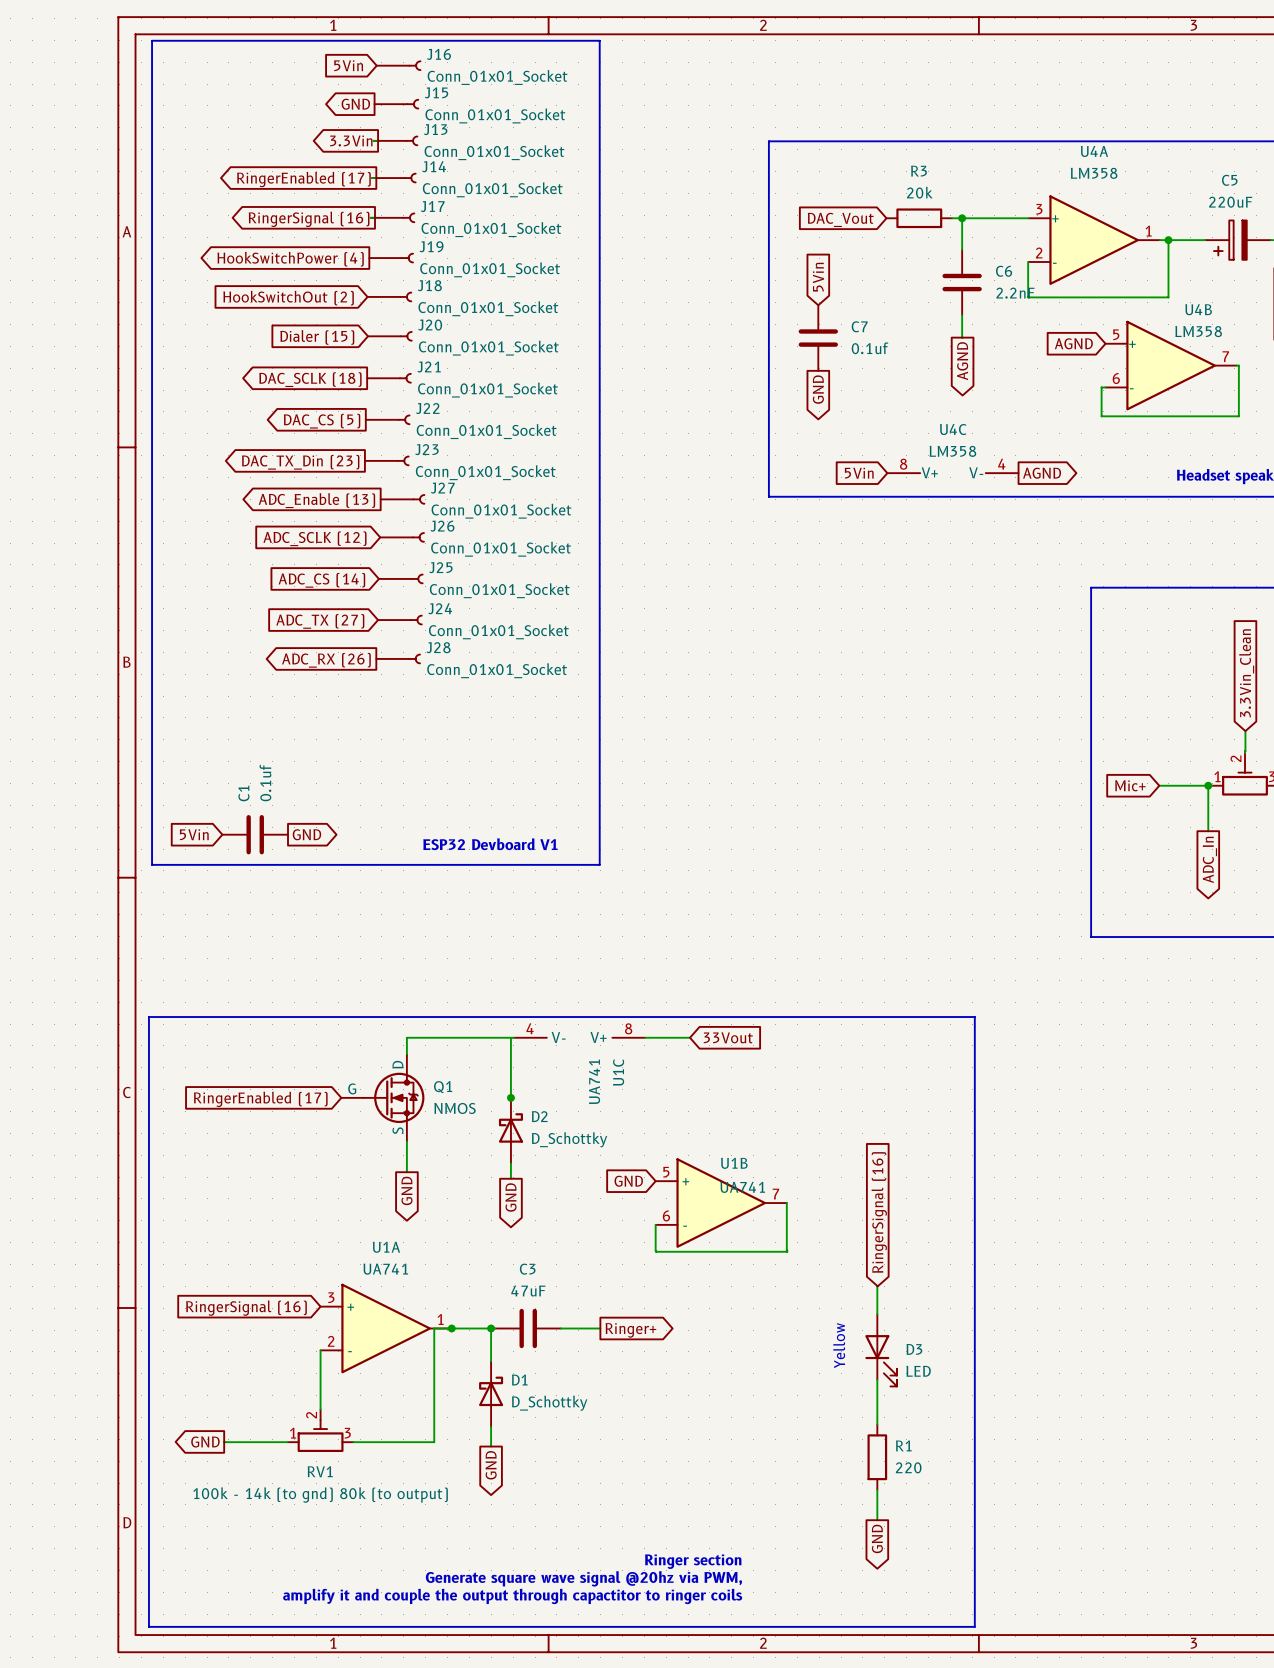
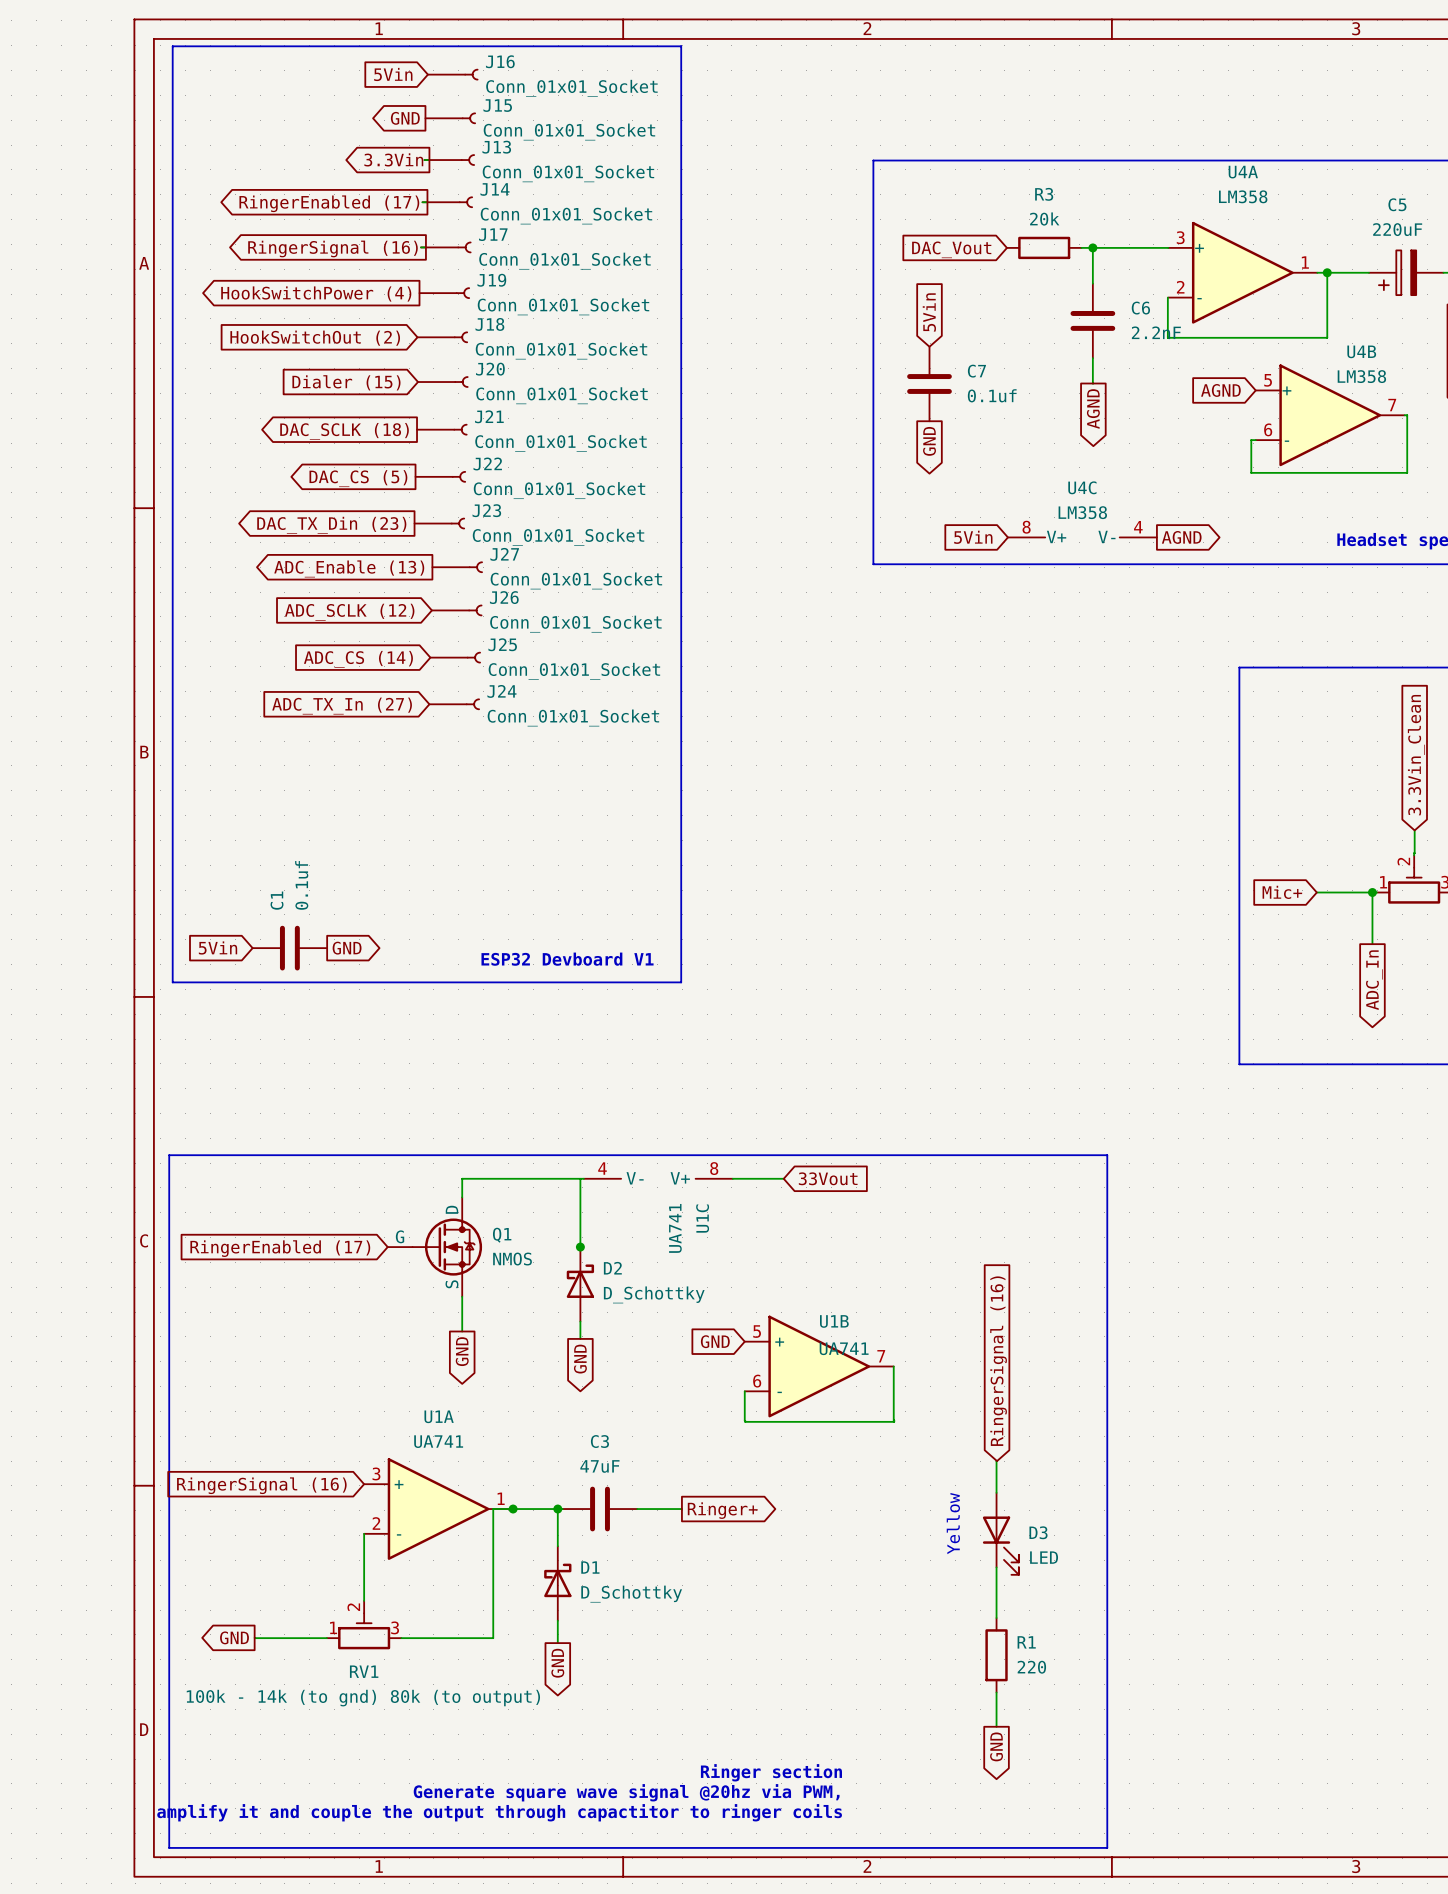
global label: ADC_TX (27) (320, 621) -> ADC_TX_In (27) (342, 706)
J28: Conn_01x01_Socket (398, 658) -> none
global label: ADC_RX (26) (326, 660) -> none

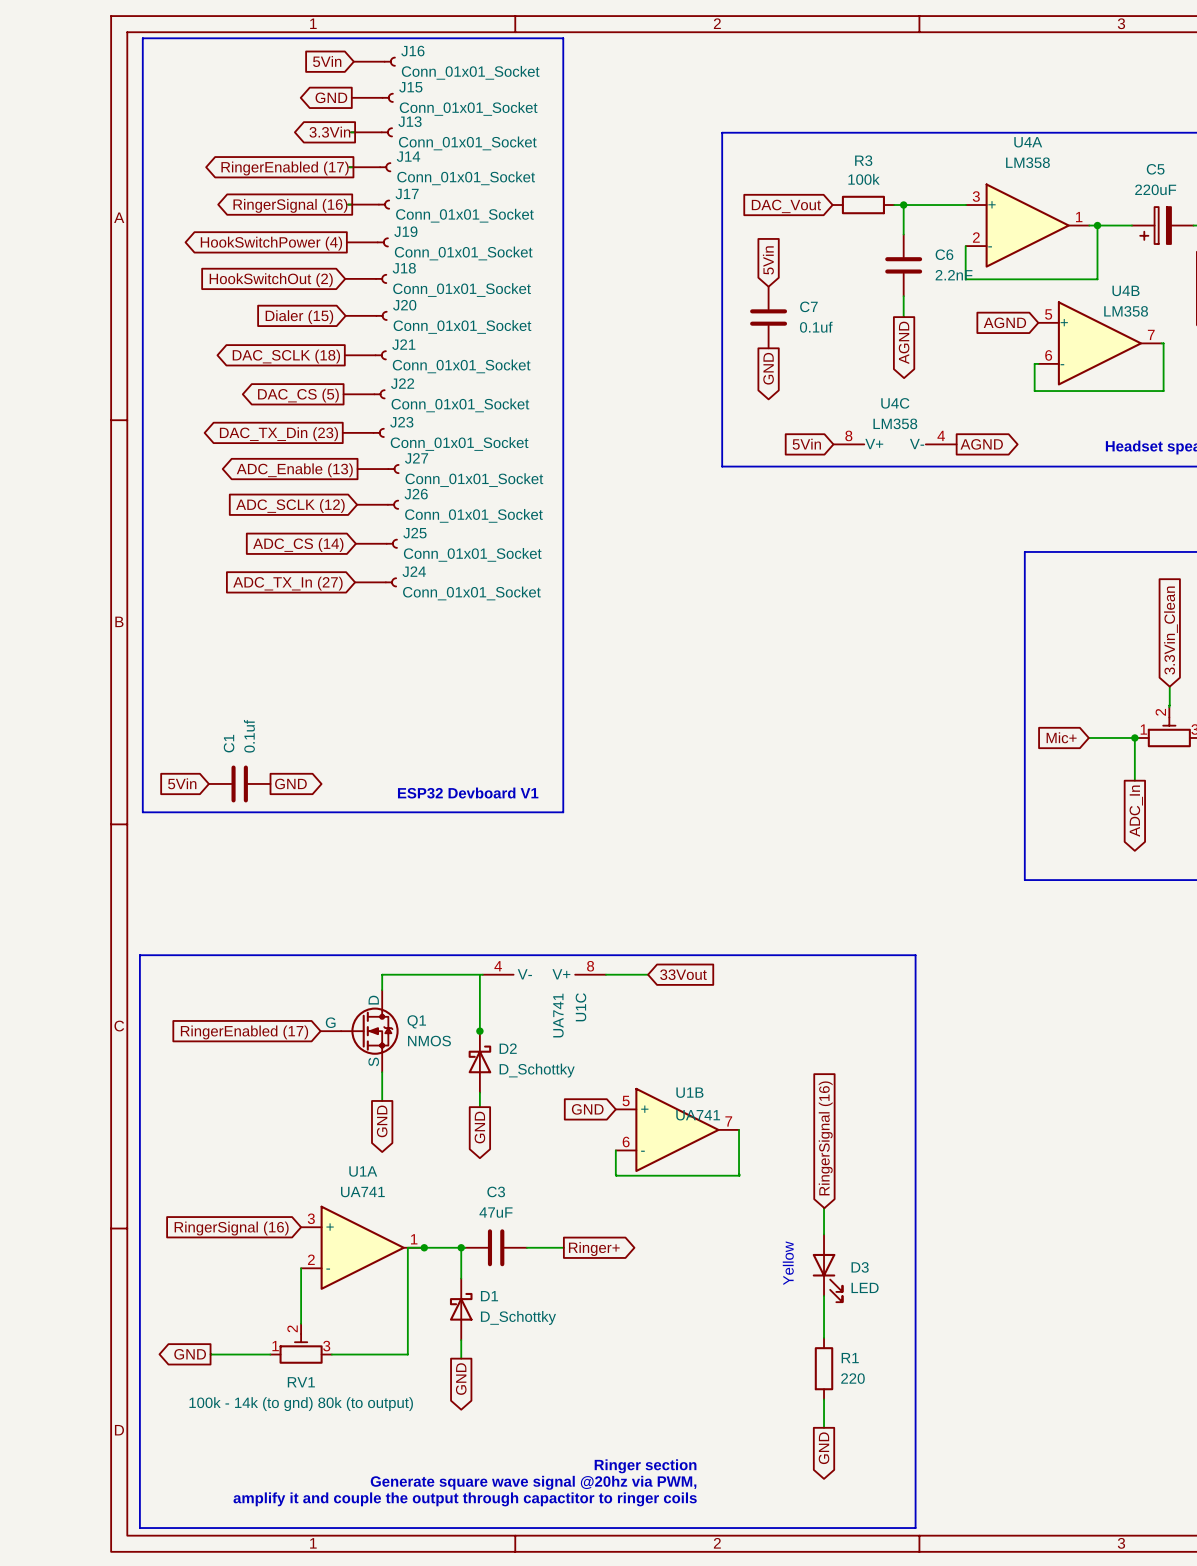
R3 value: 20k (1044, 219) -> 100k (864, 179)

